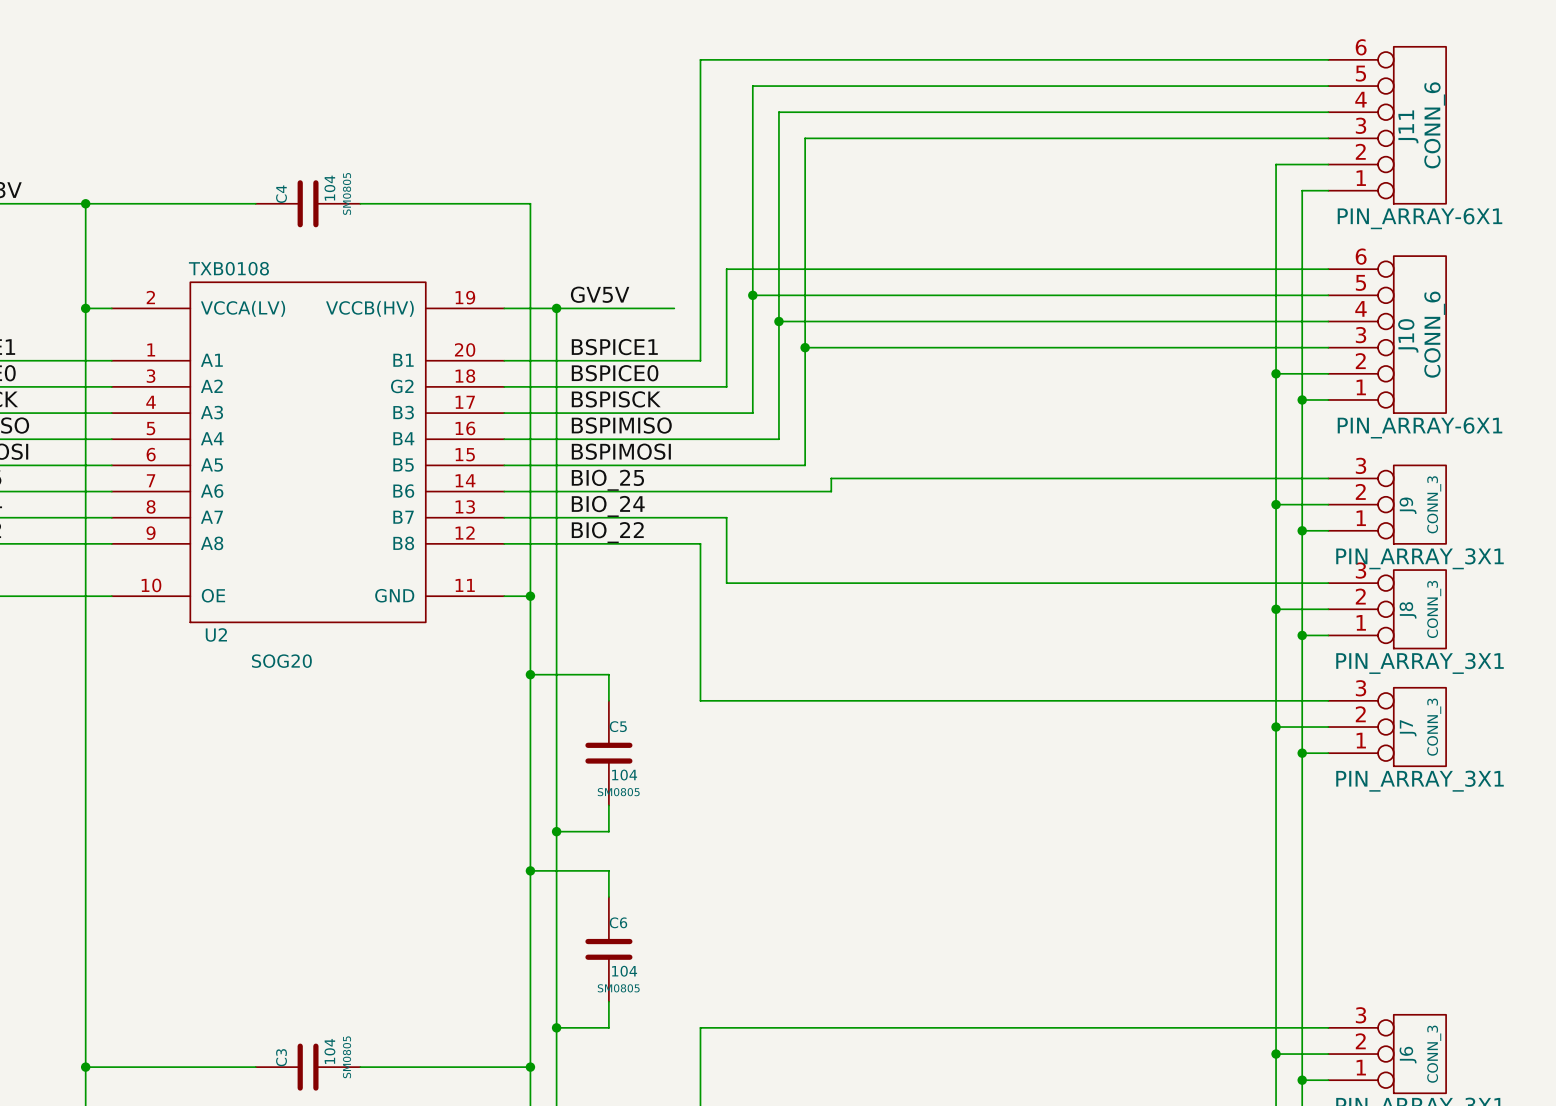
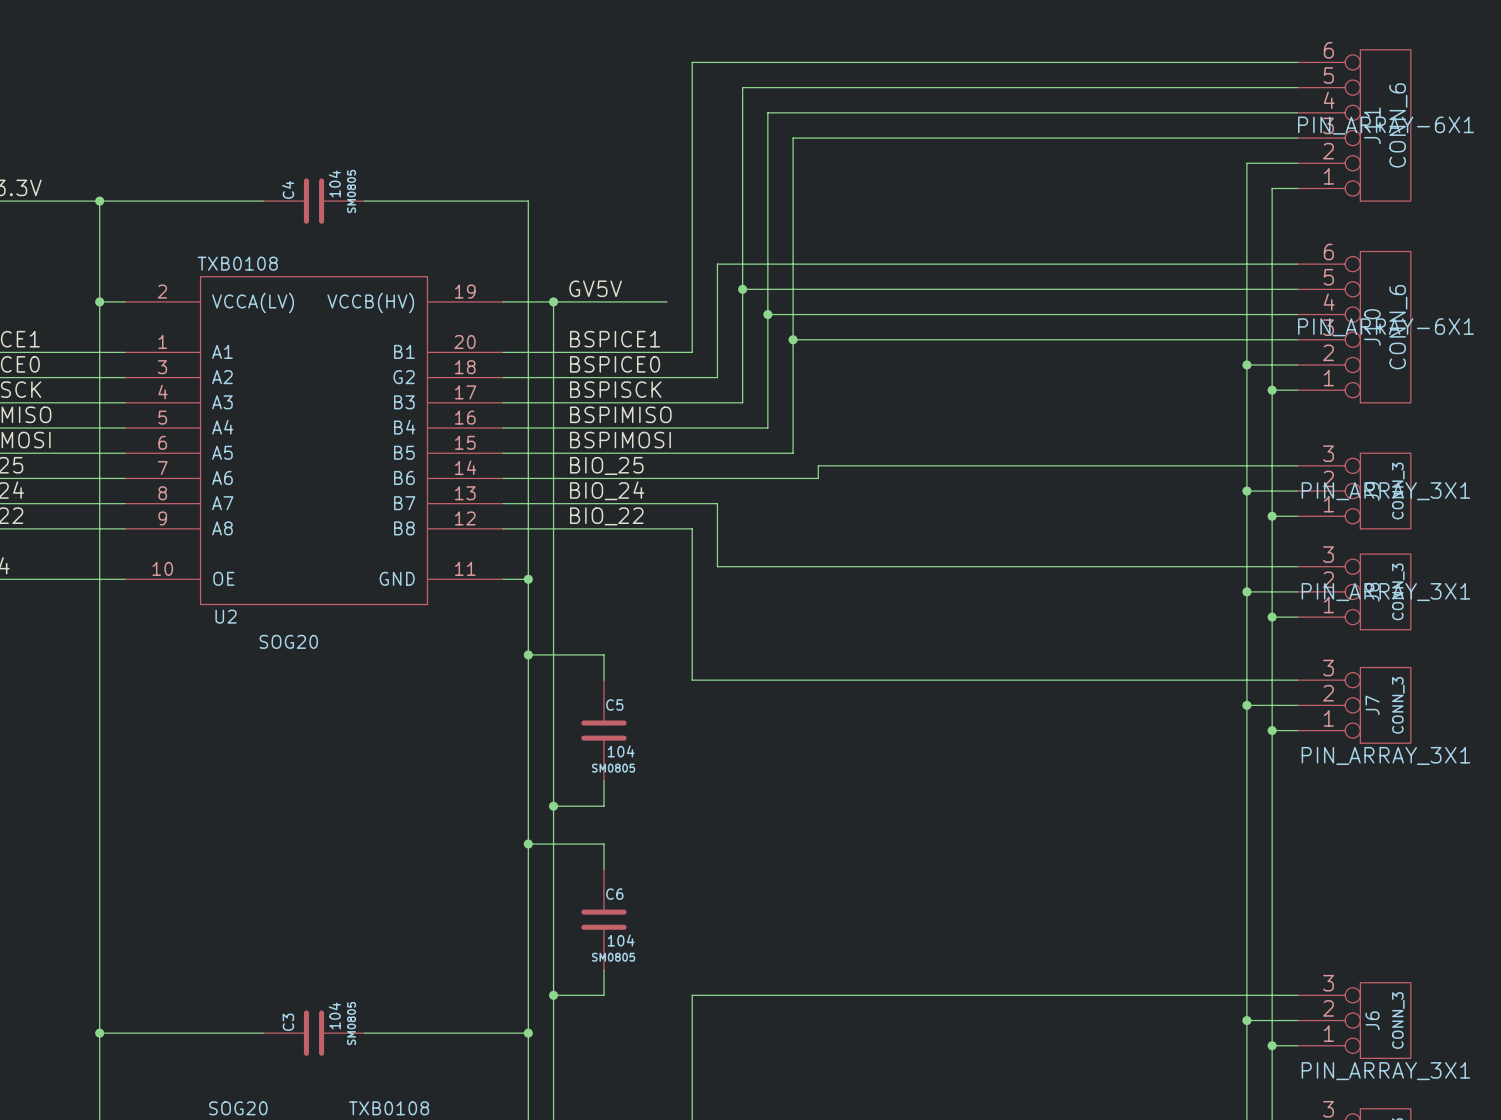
J11 text position: PIN_ARRAY-6X1 (1419, 218) -> PIN_ARRAY-6X1 (1385, 125)
J10 text position: PIN_ARRAY-6X1 (1419, 427) -> PIN_ARRAY-6X1 (1385, 327)
J9 text position: PIN_ARRAY_3X1 (1419, 558) -> PIN_ARRAY_3X1 (1385, 491)
J8 text position: PIN_ARRAY_3X1 (1419, 663) -> PIN_ARRAY_3X1 (1385, 592)

